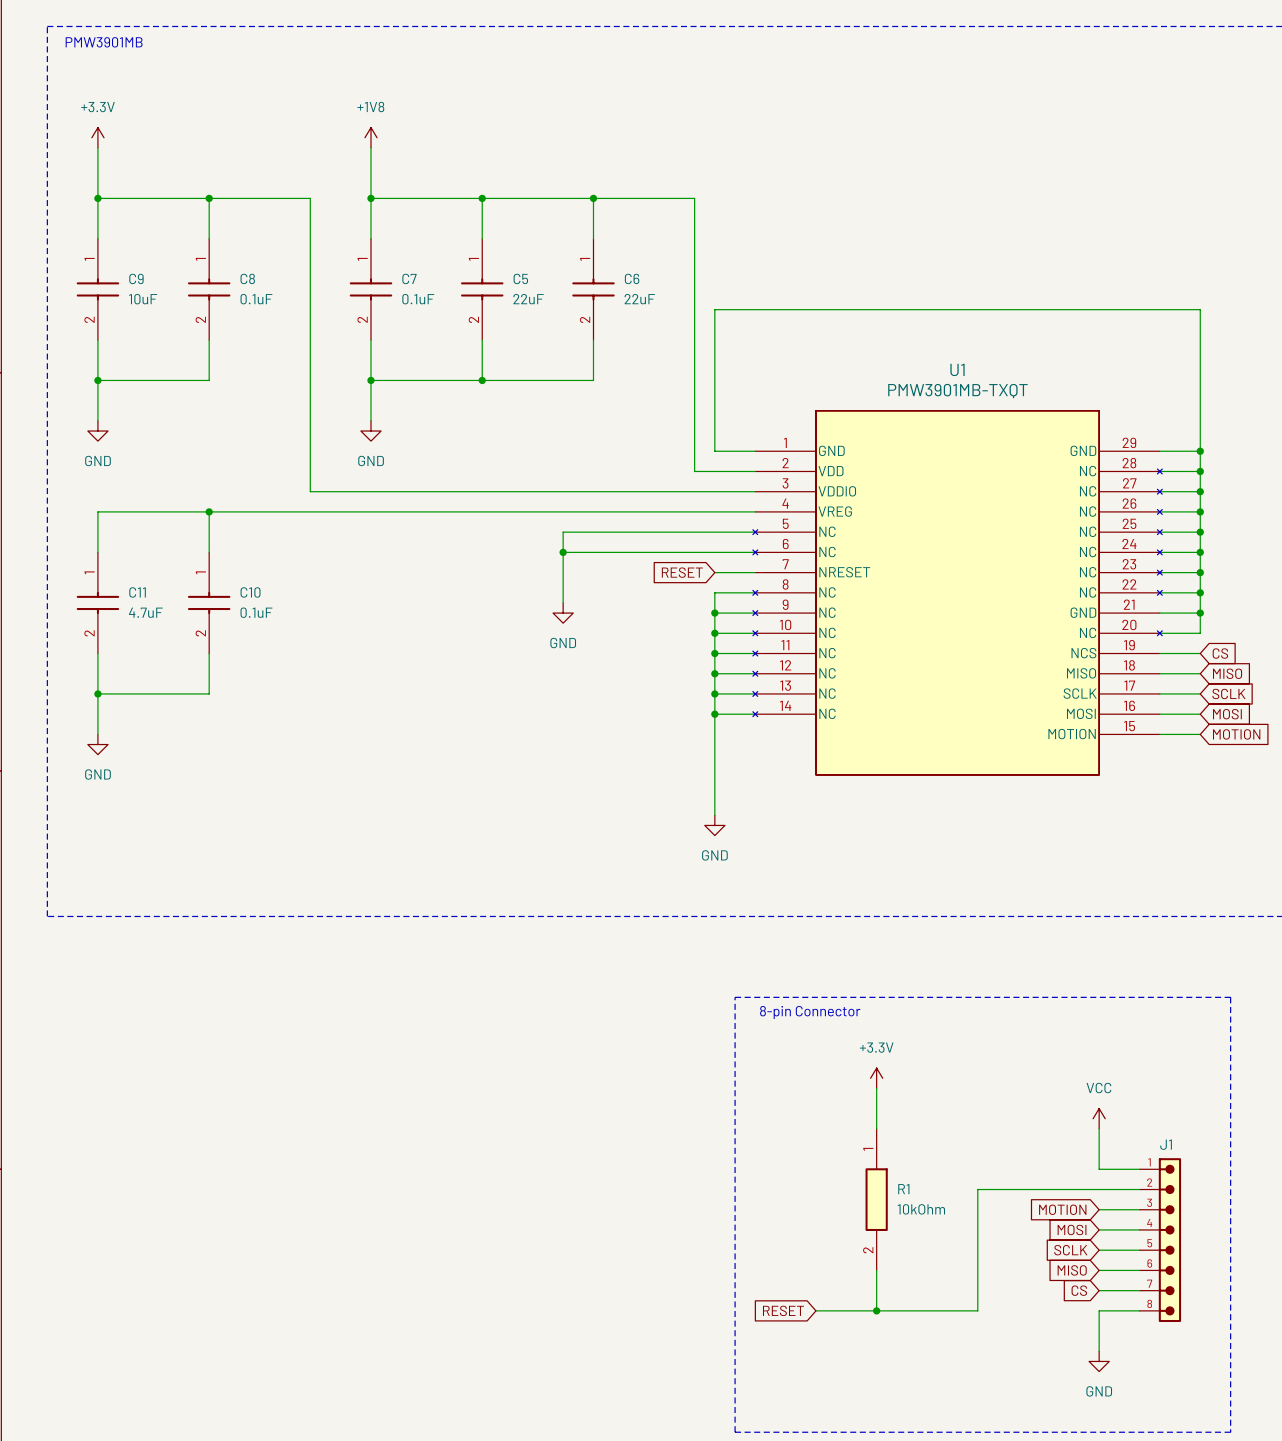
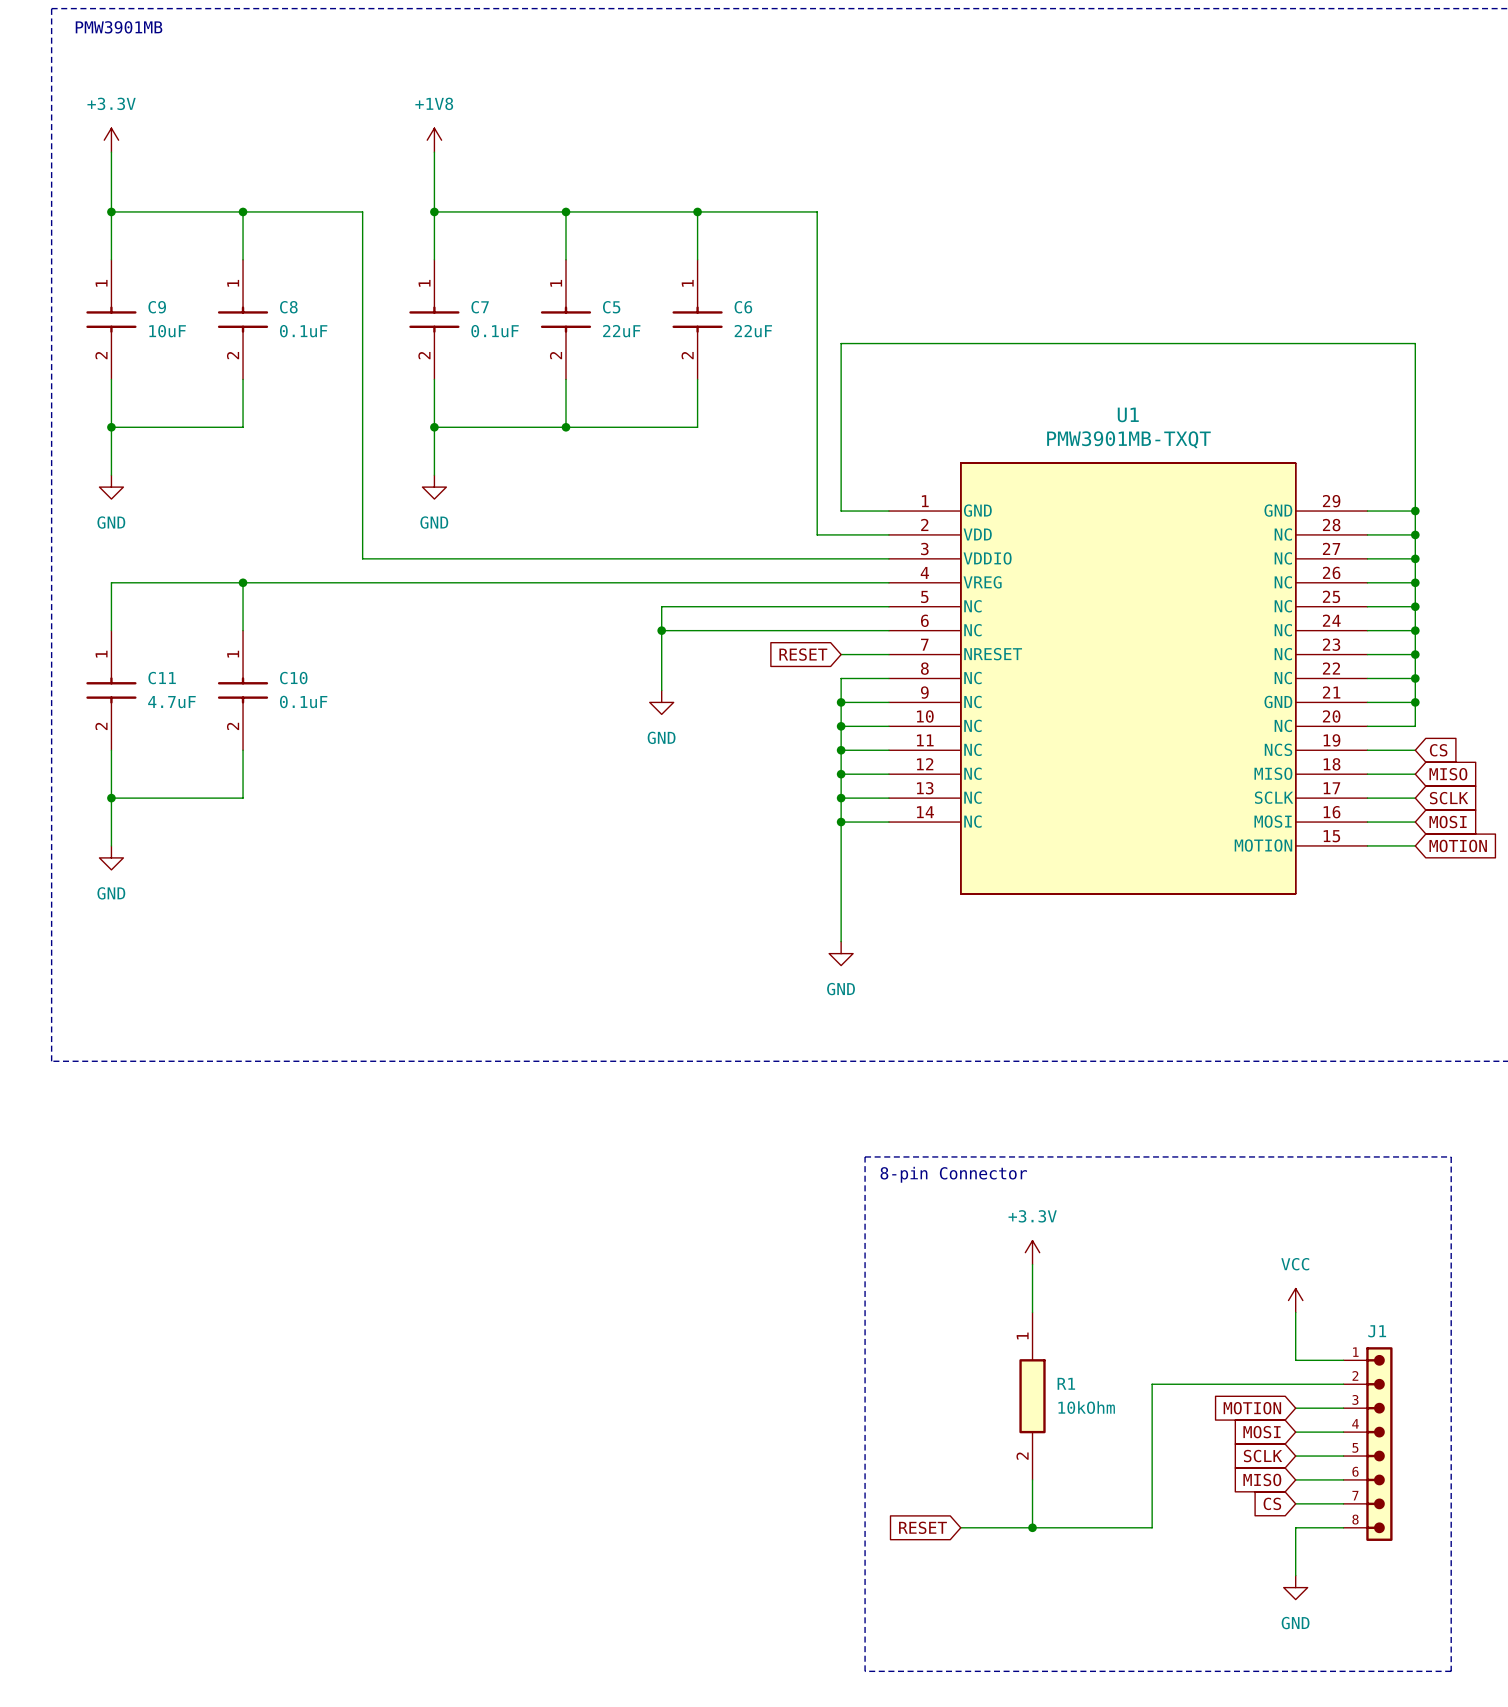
U1 symbol: [752, 410, 1163, 776] -> [888, 462, 1368, 895]

